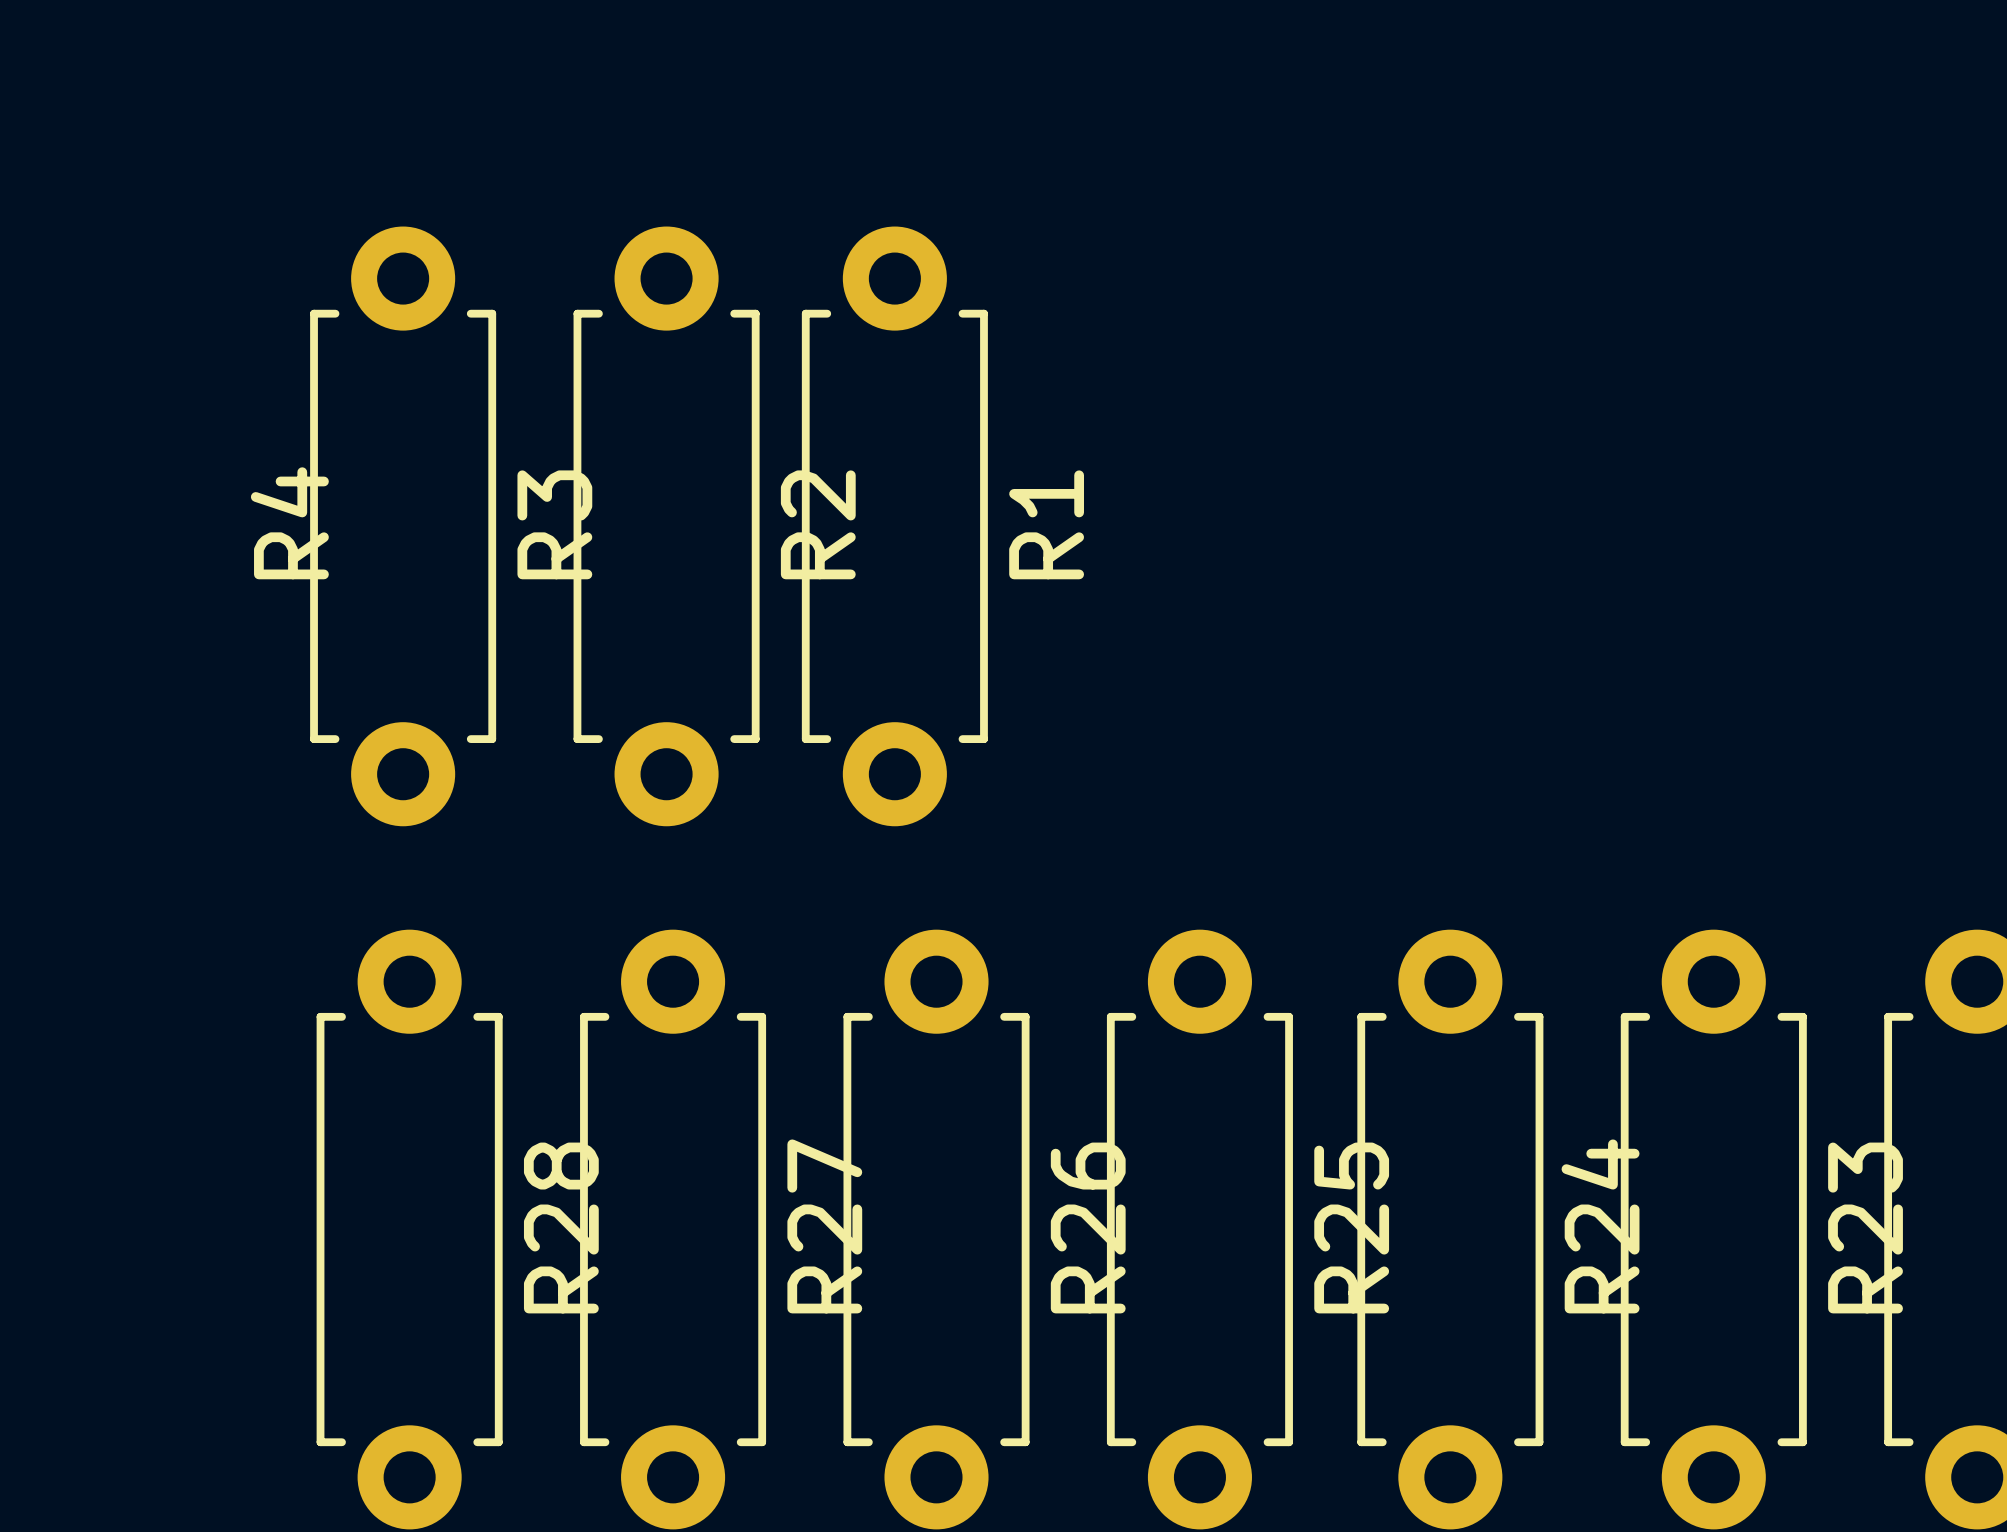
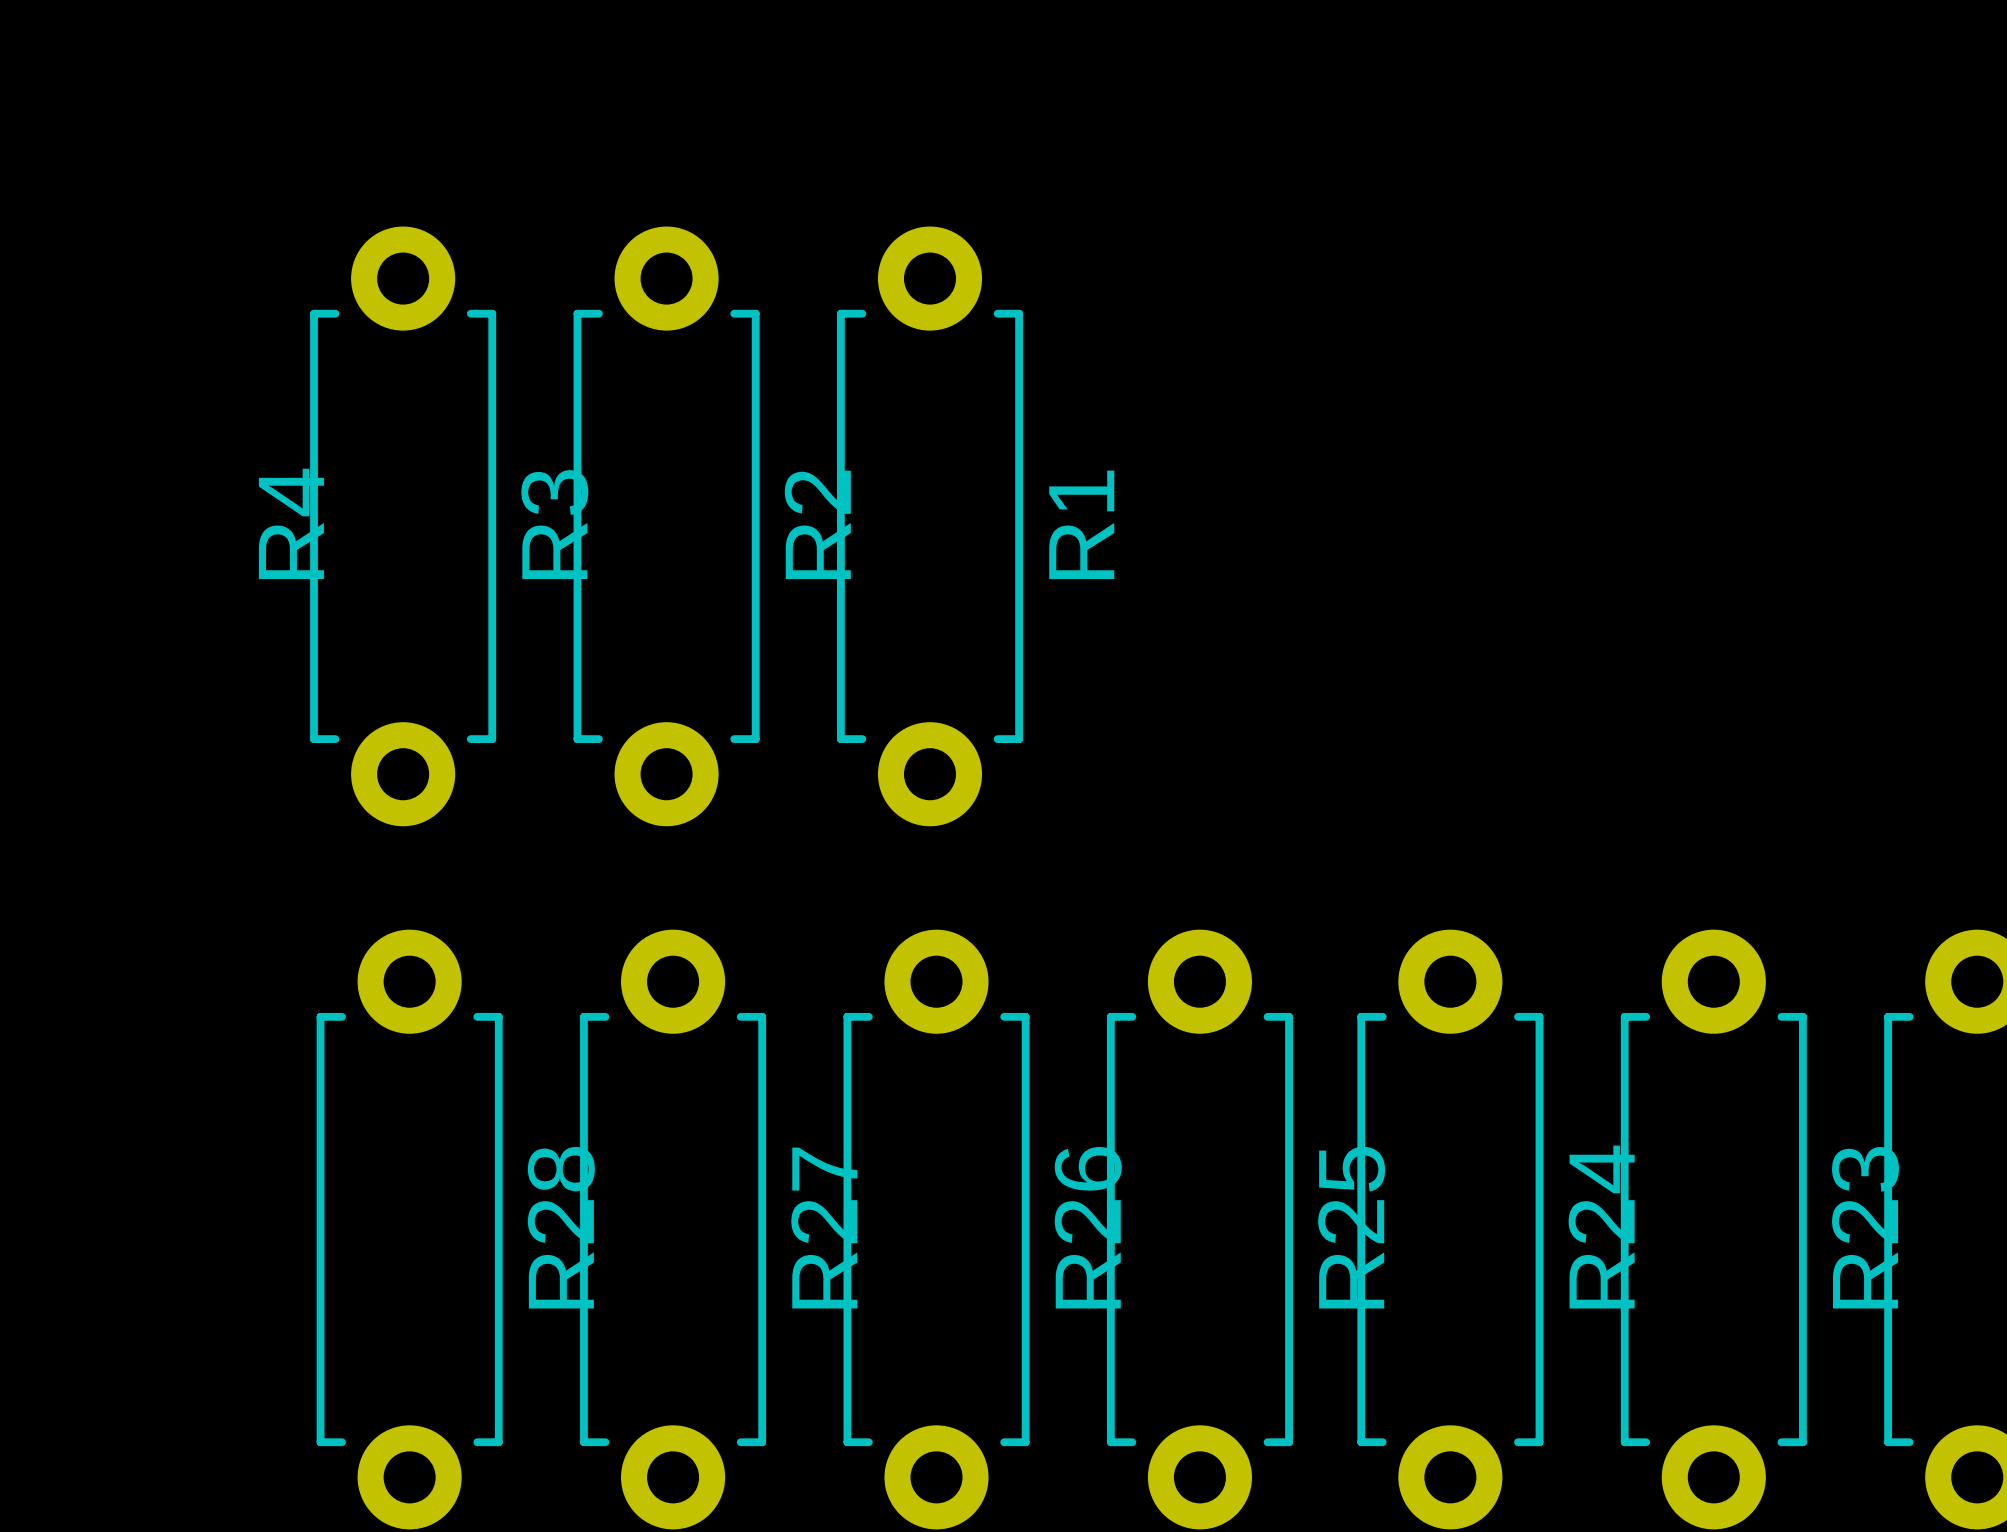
R1 position: (894, 526) -> (930, 526)

